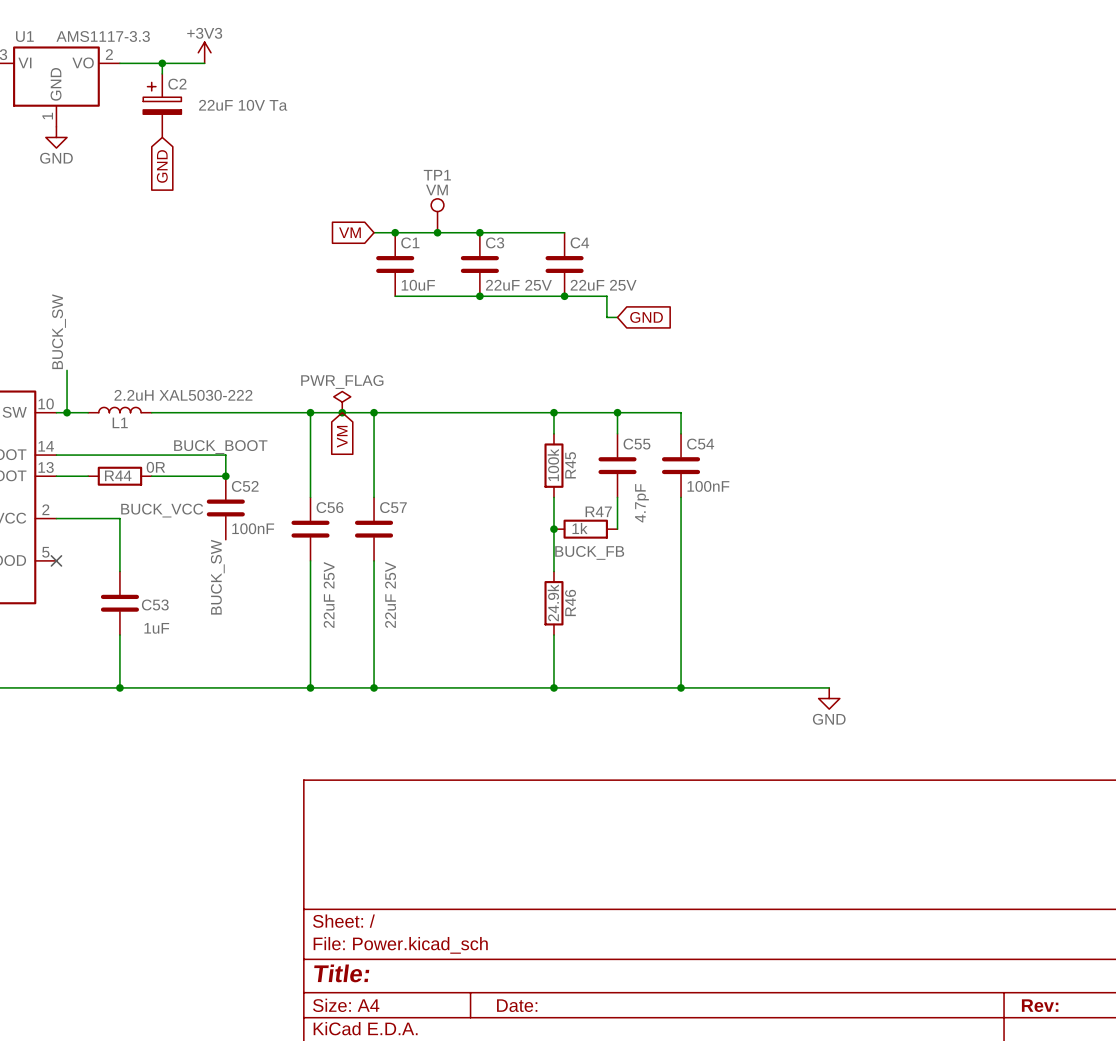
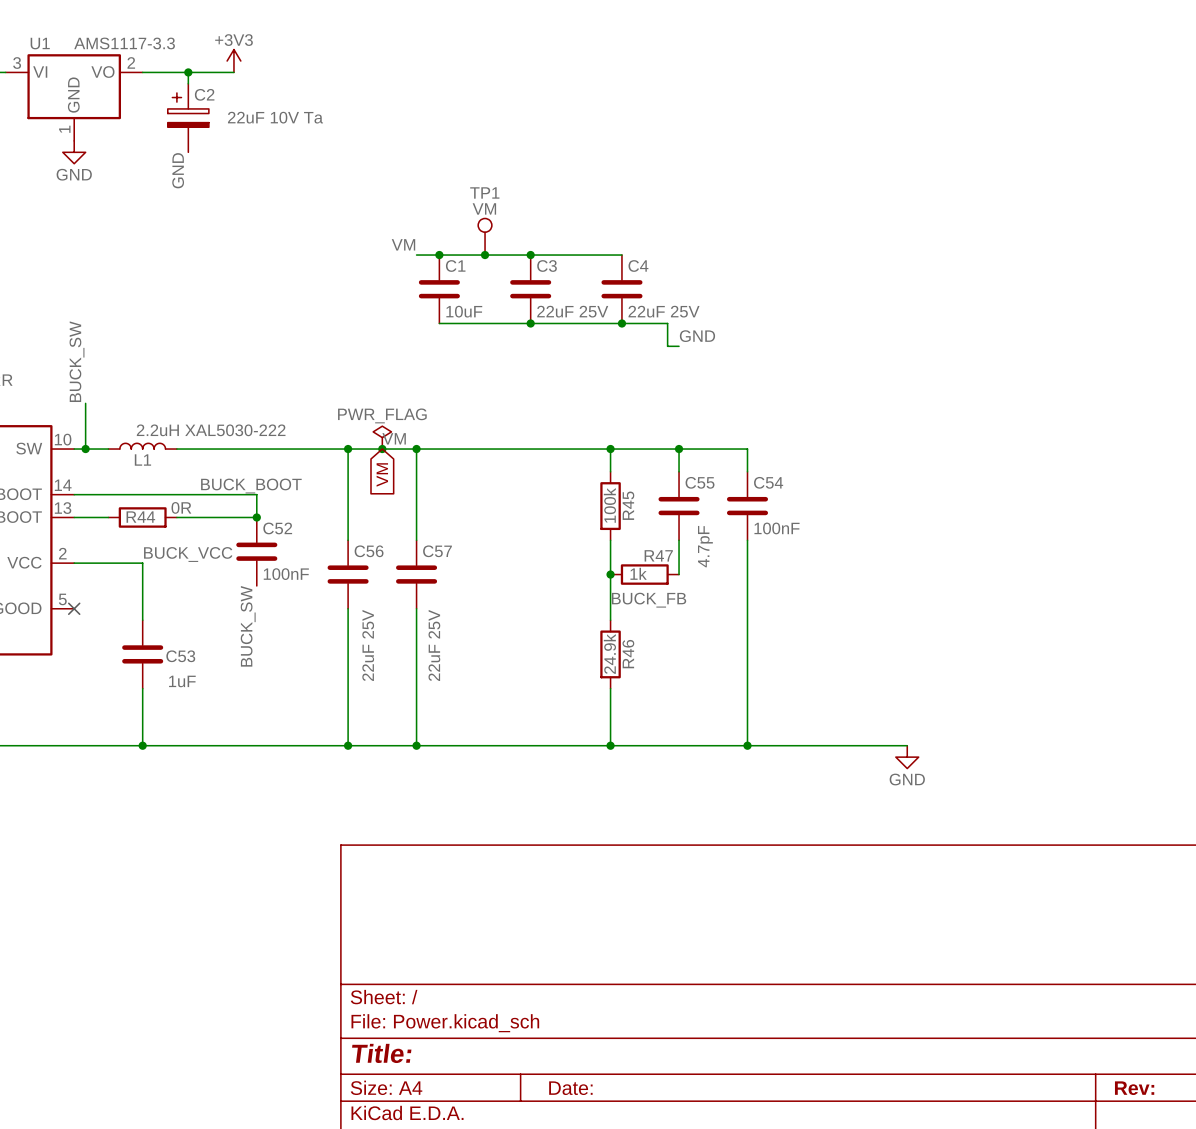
label: none -> GND (178, 170)
global label: GND (162, 166) -> none
label: none -> VM (403, 244)
global label: VM (349, 232) -> none
label: none -> GND (697, 336)
global label: GND (646, 317) -> none
label: none -> VM (394, 438)

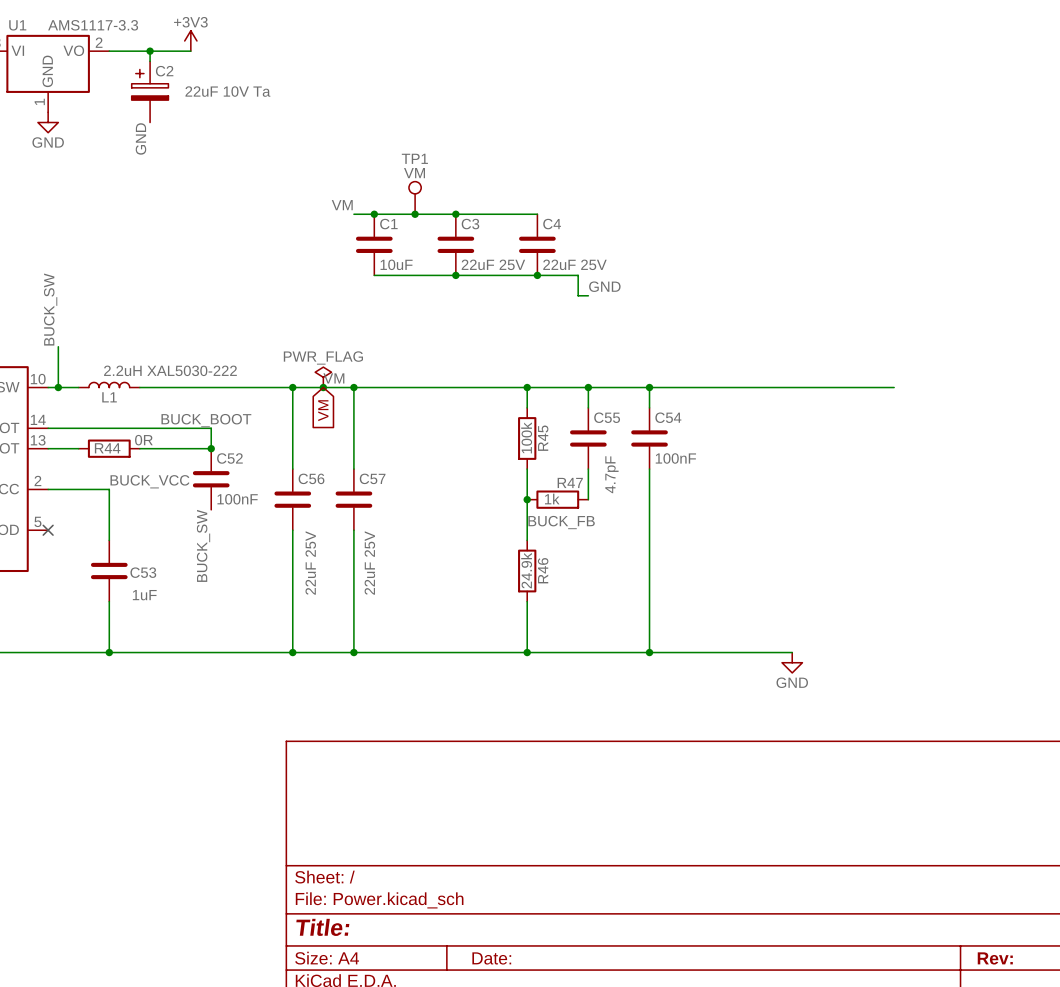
wire: none -> (649, 387) (894, 387)
junction: none -> (649, 387)

